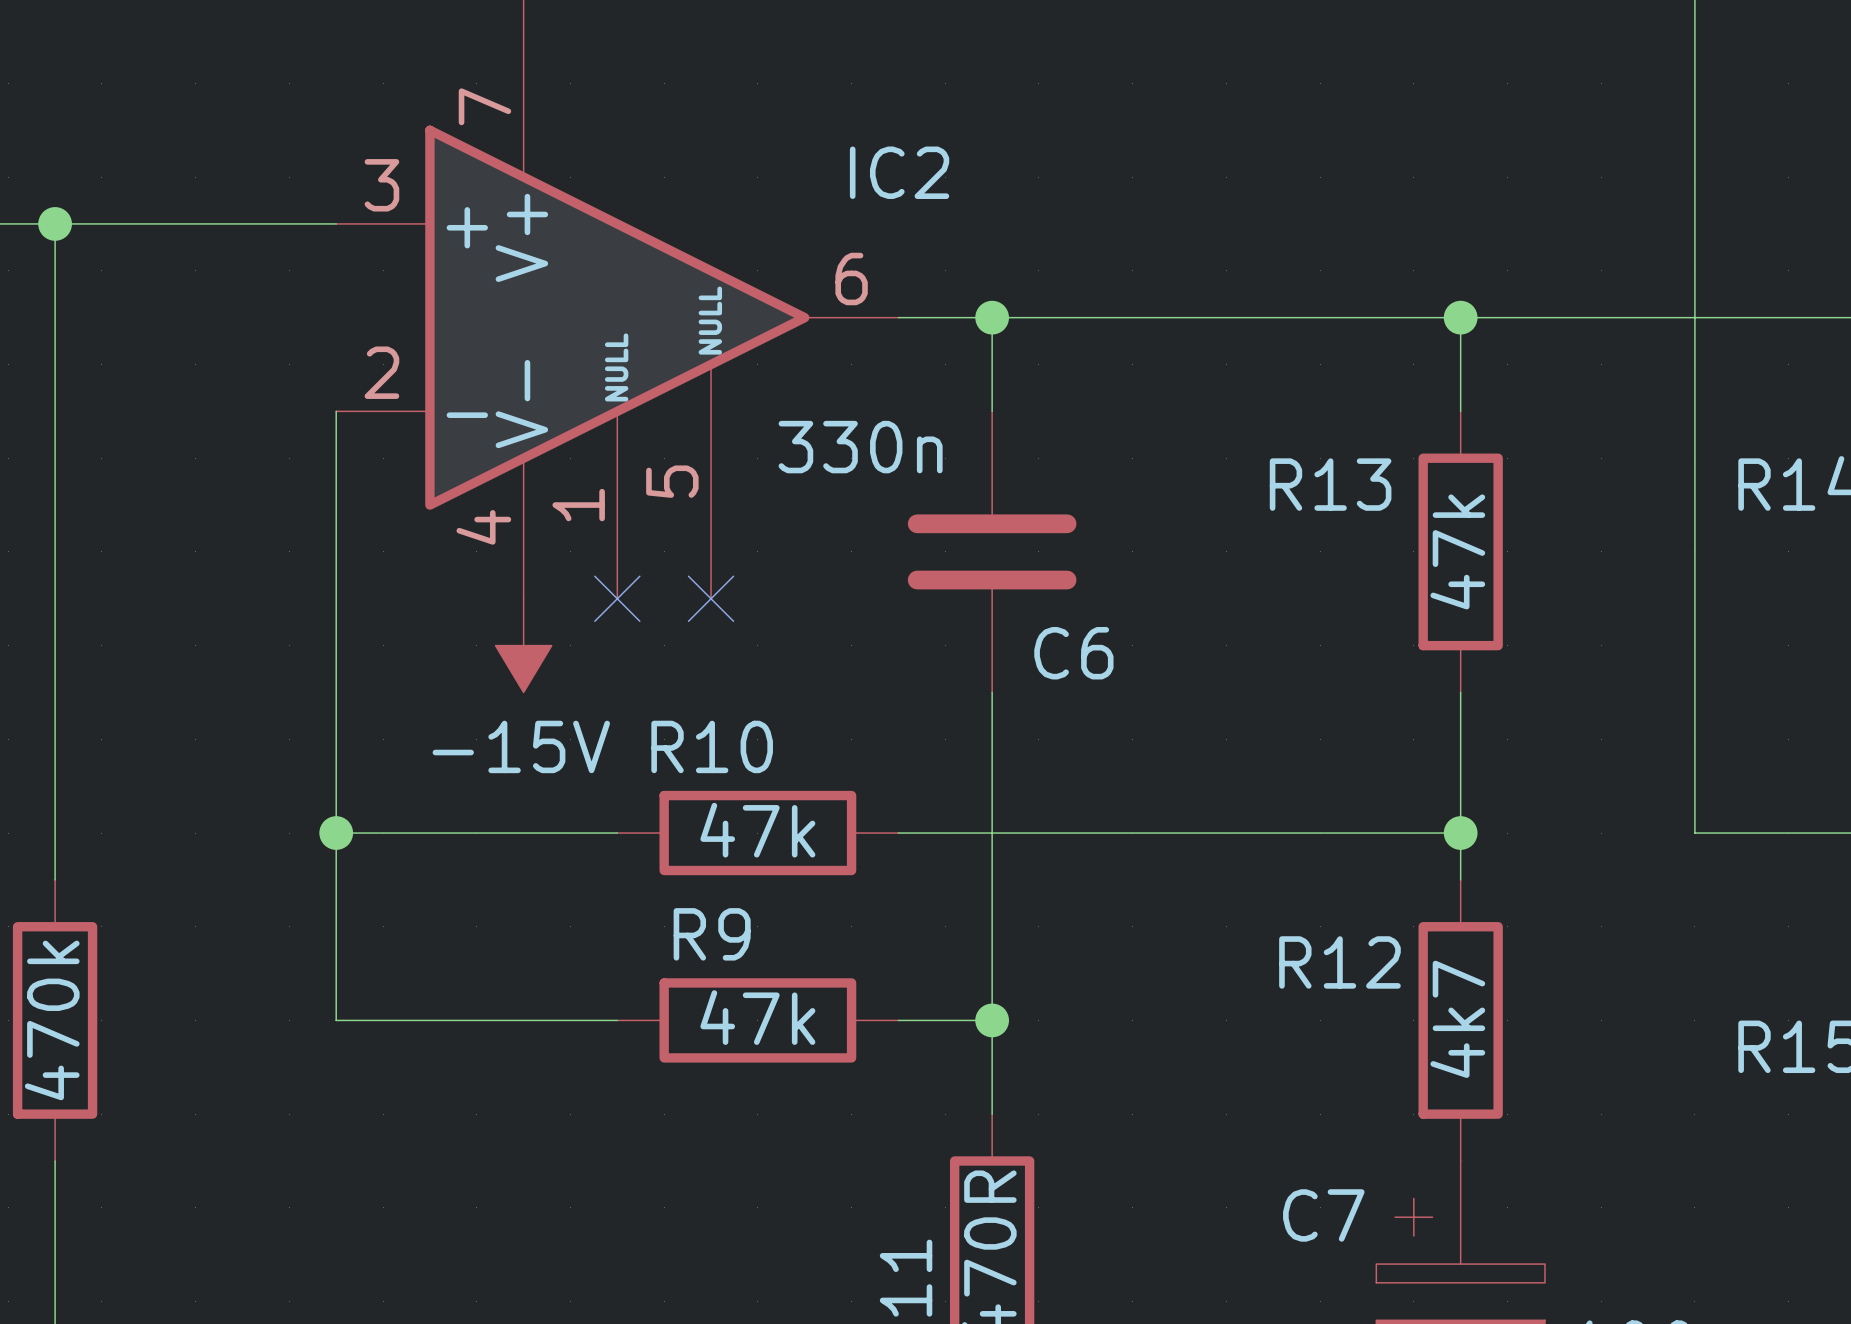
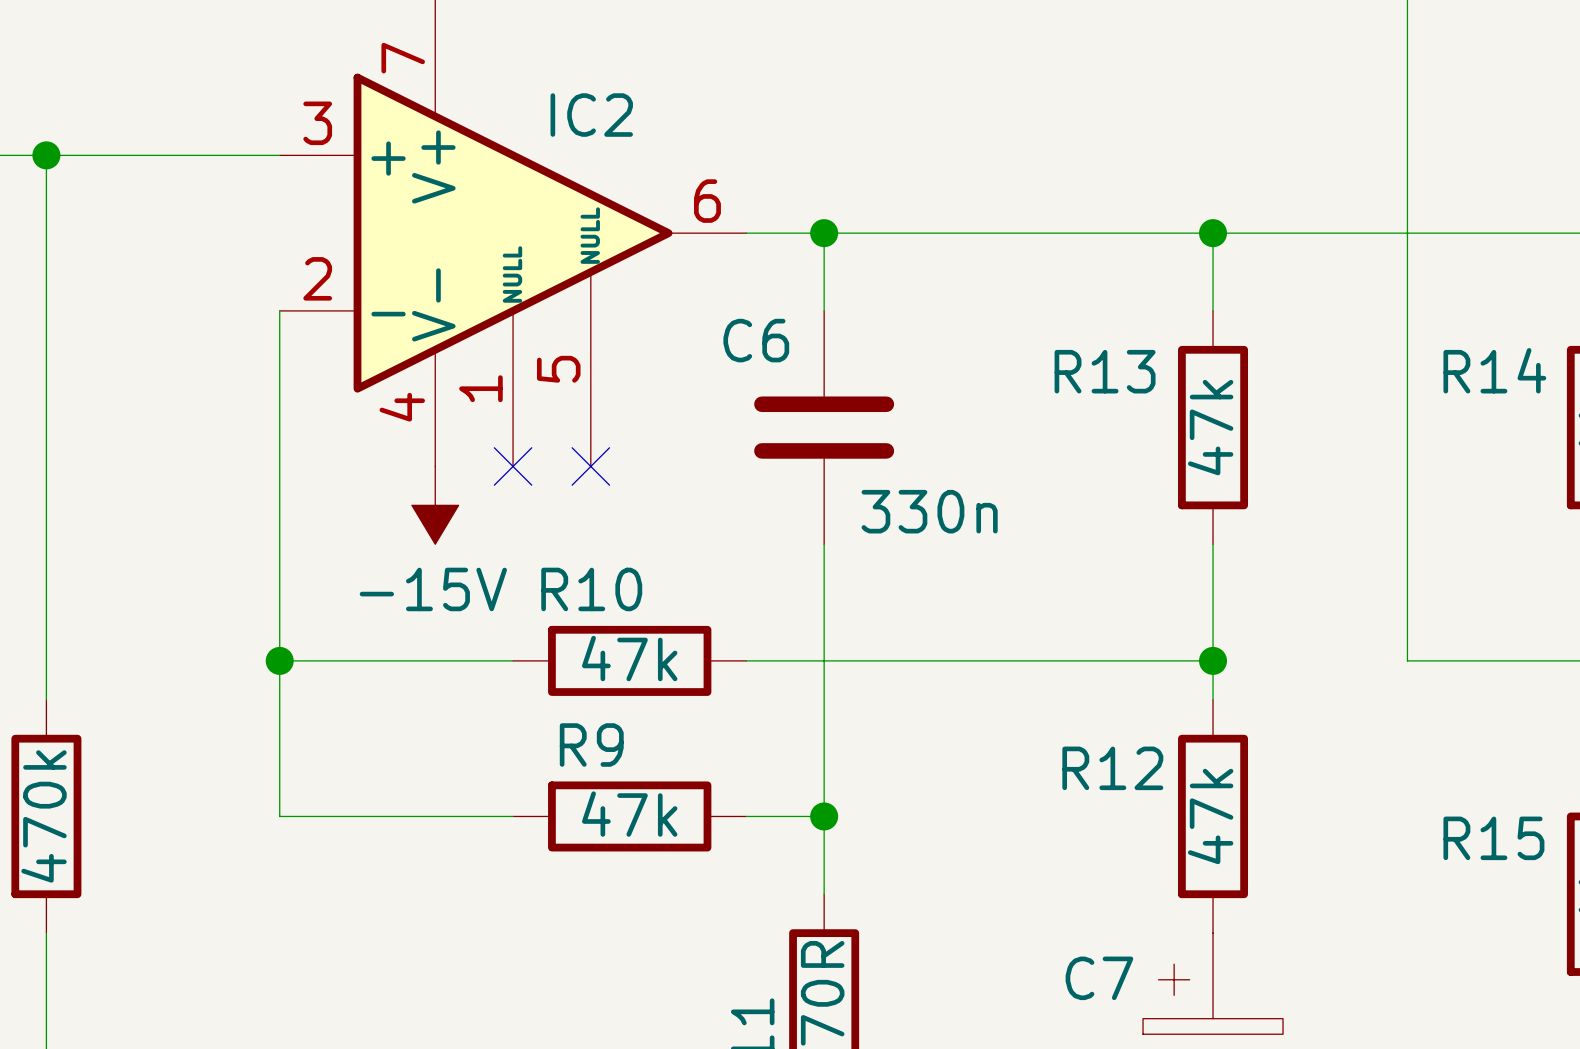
IC2 name position: IC2 (899, 172) -> IC2 (591, 115)
C6 value position: 330n (860, 447) -> 330n (929, 511)
C6 name position: C6 (1073, 653) -> C6 (756, 340)
R12 value: 4k7 (1457, 1019) -> 47k (1210, 816)

